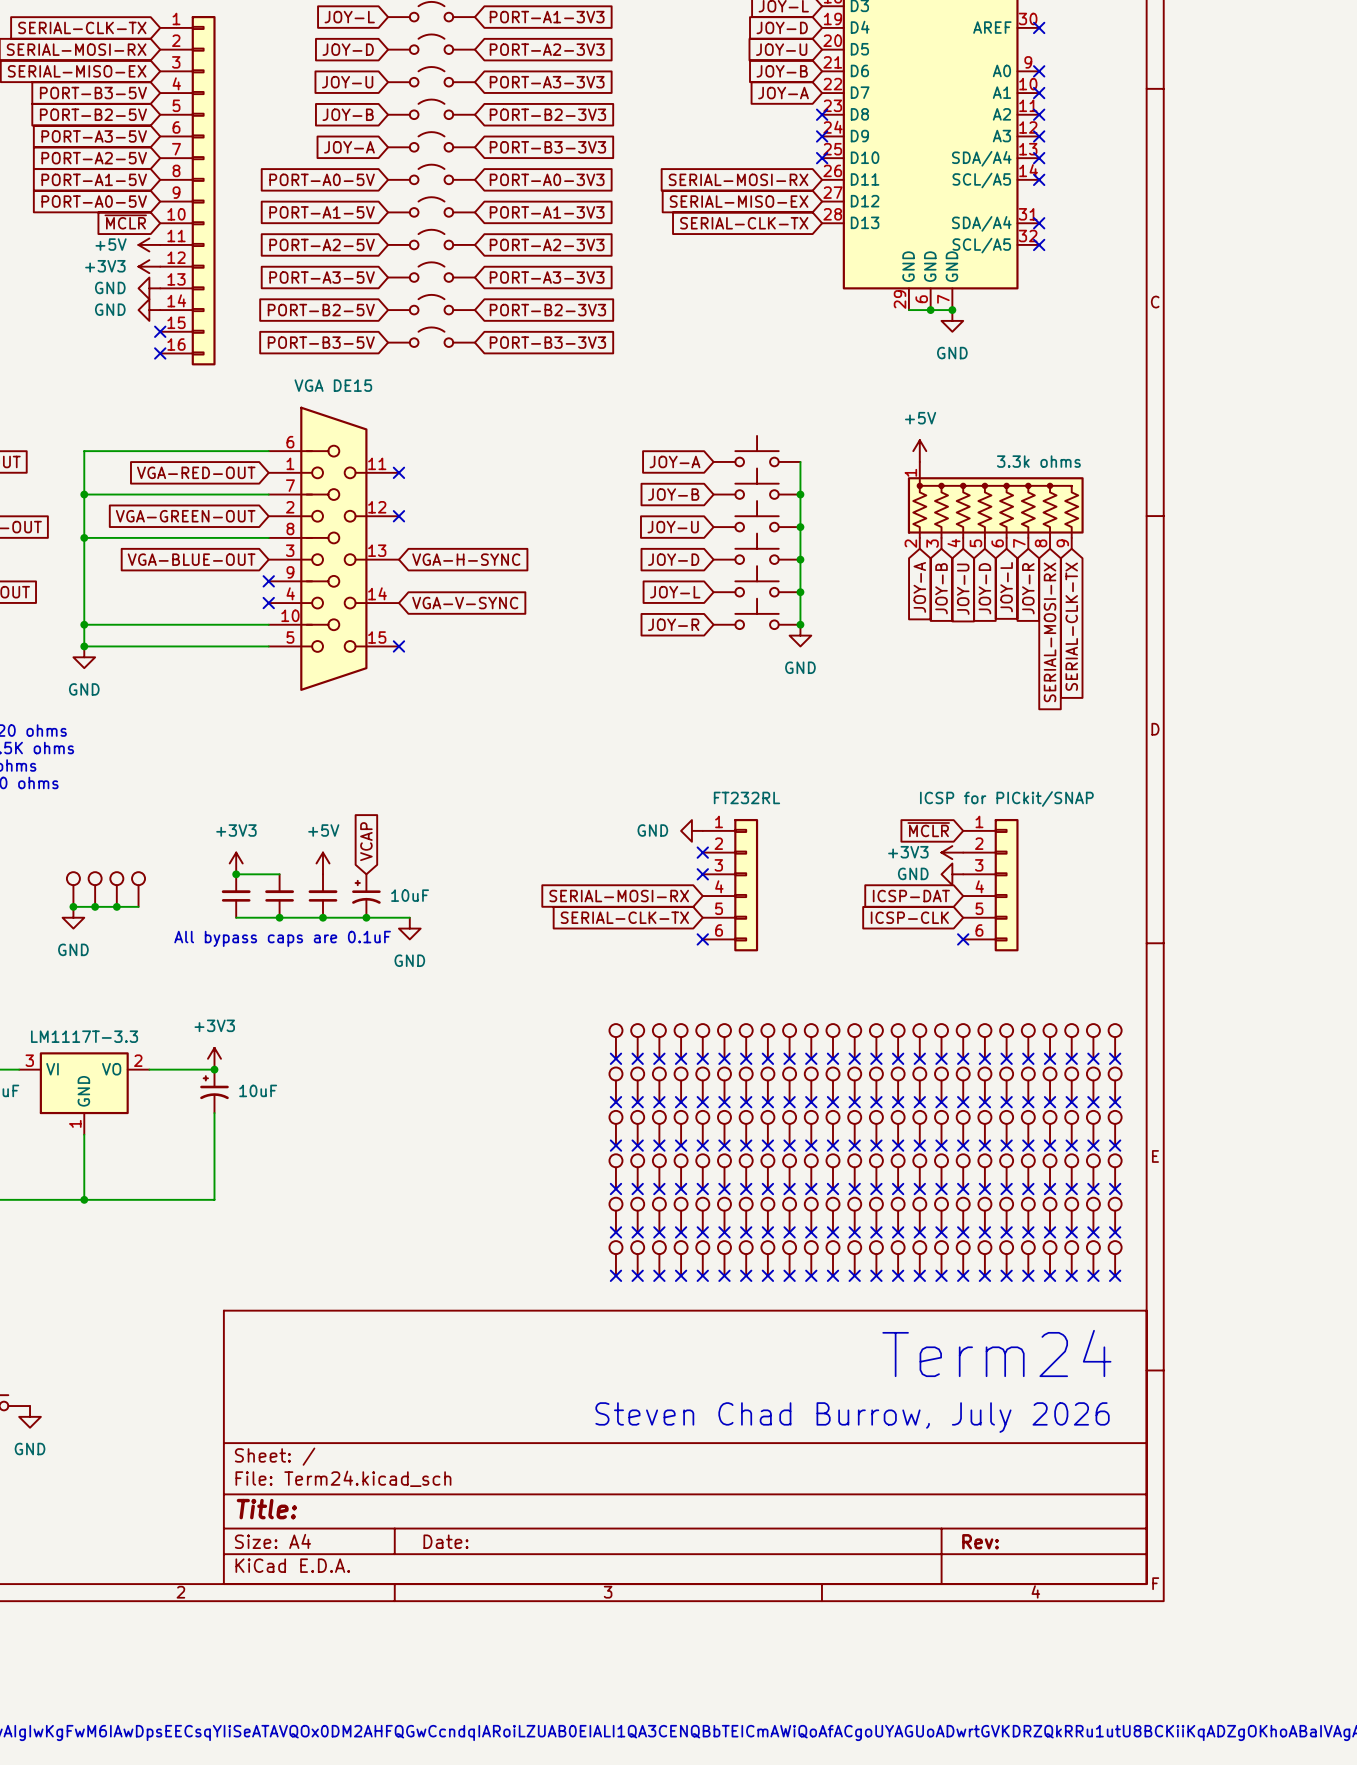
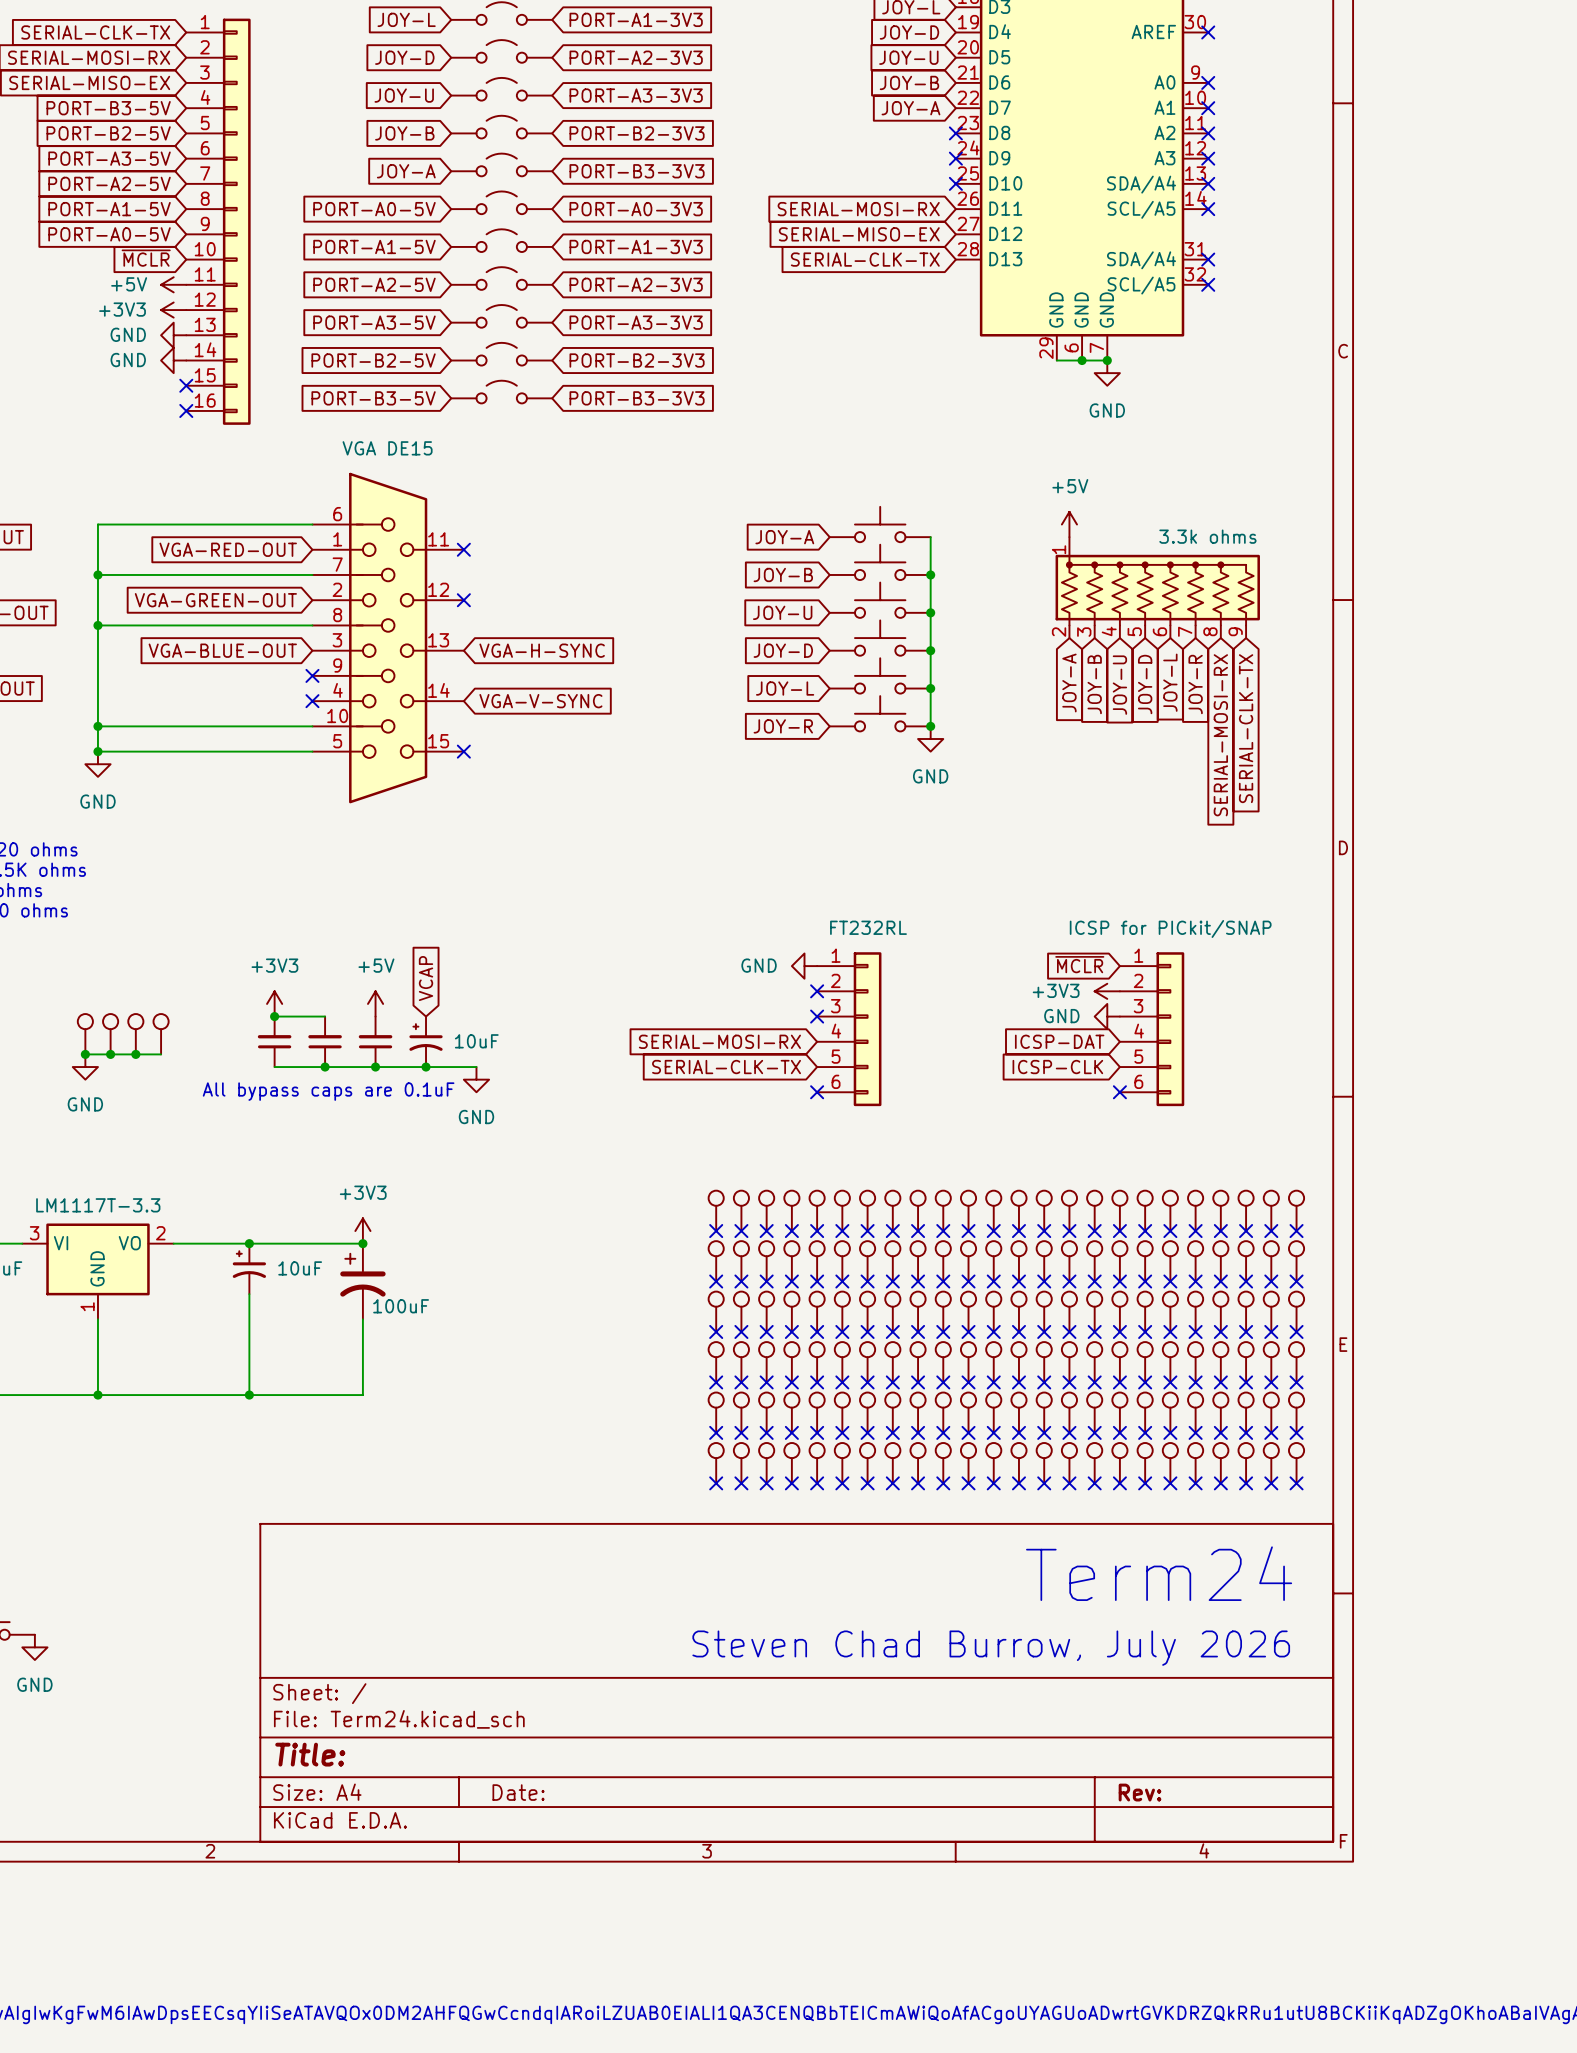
power symbol position: +3V3 (214, 1058) -> +3V3 (362, 1231)
wire: none -> (249, 1243) (362, 1243)
junction: none -> (362, 1243)
part: none -> (362, 1281)
wire: none -> (362, 1319) (362, 1395) (249, 1395)
junction: none -> (249, 1395)

